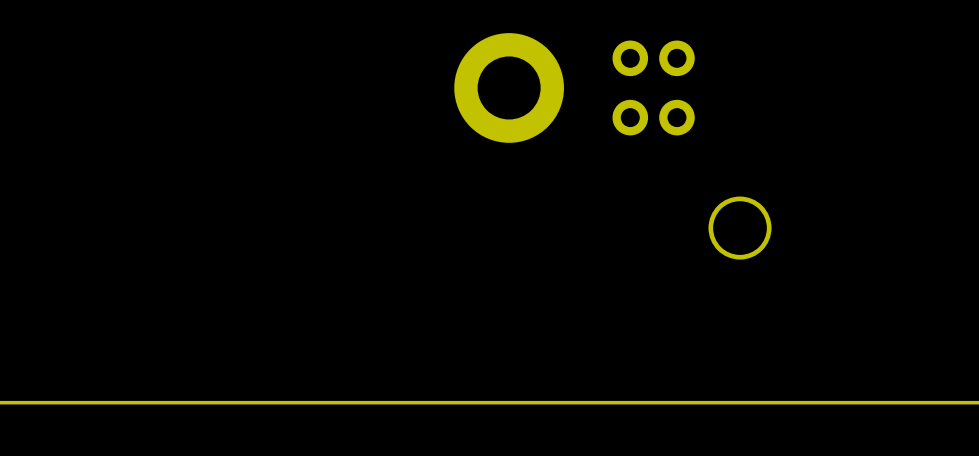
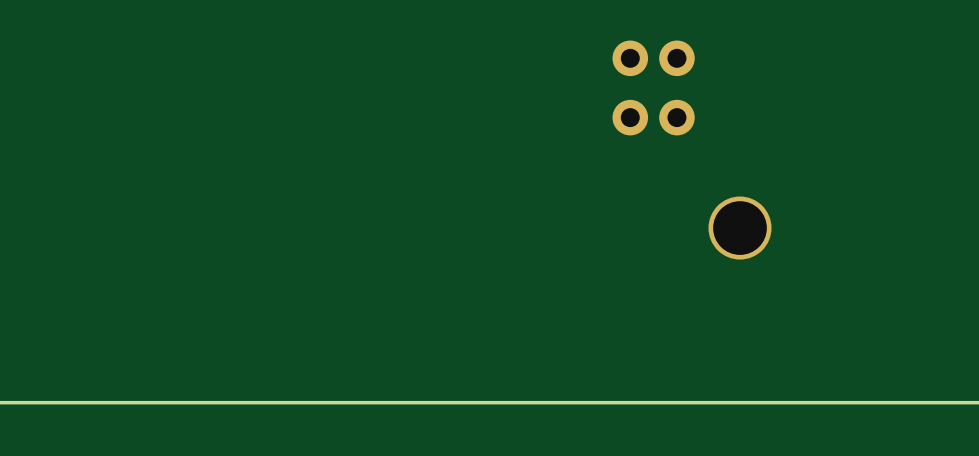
part: (509, 87) -> none

